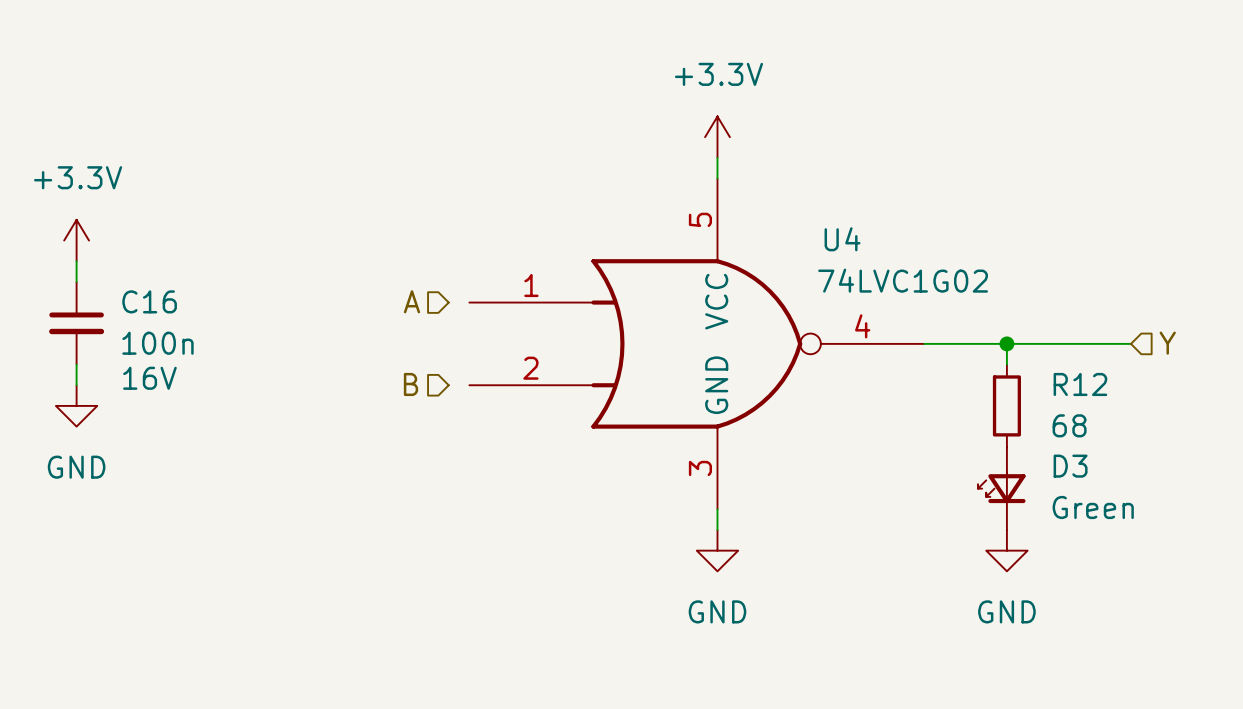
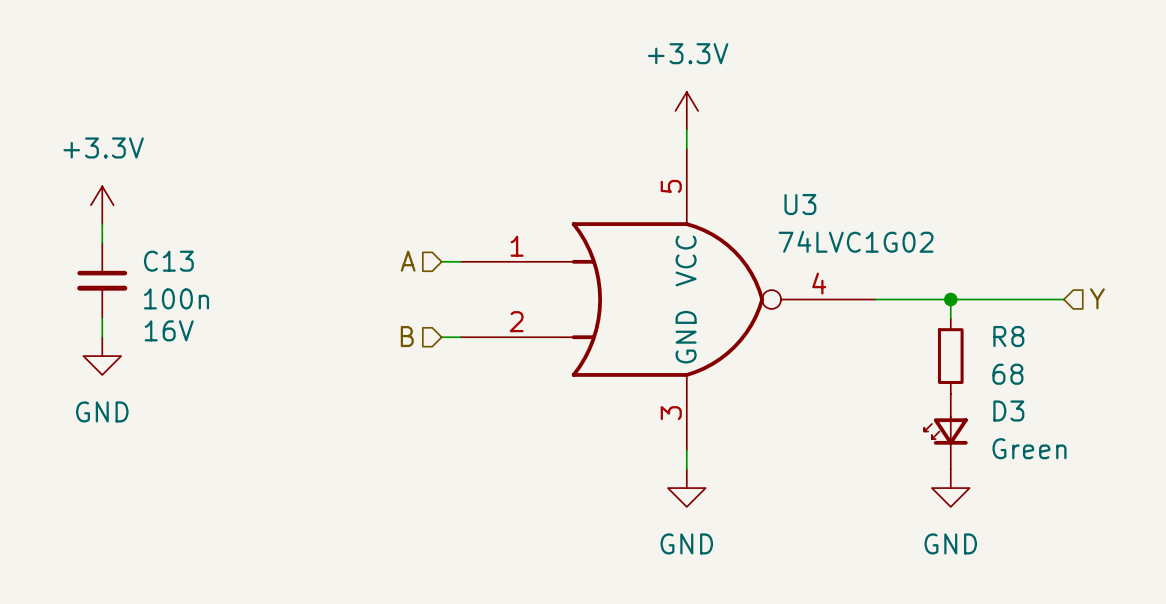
U4 name: U4 (842, 239) -> U3 (800, 204)
C16 name: C16 (149, 301) -> C13 (168, 261)
wire: none -> (441, 261) (460, 261)
R12 name: R12 (1080, 384) -> R8 (1008, 336)
wire: none -> (441, 337) (460, 337)

